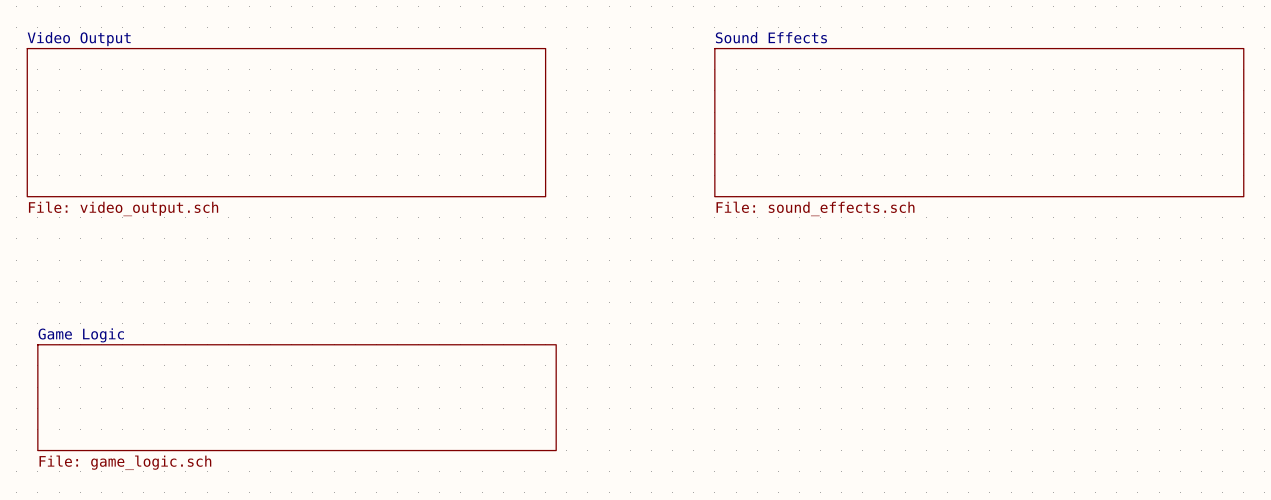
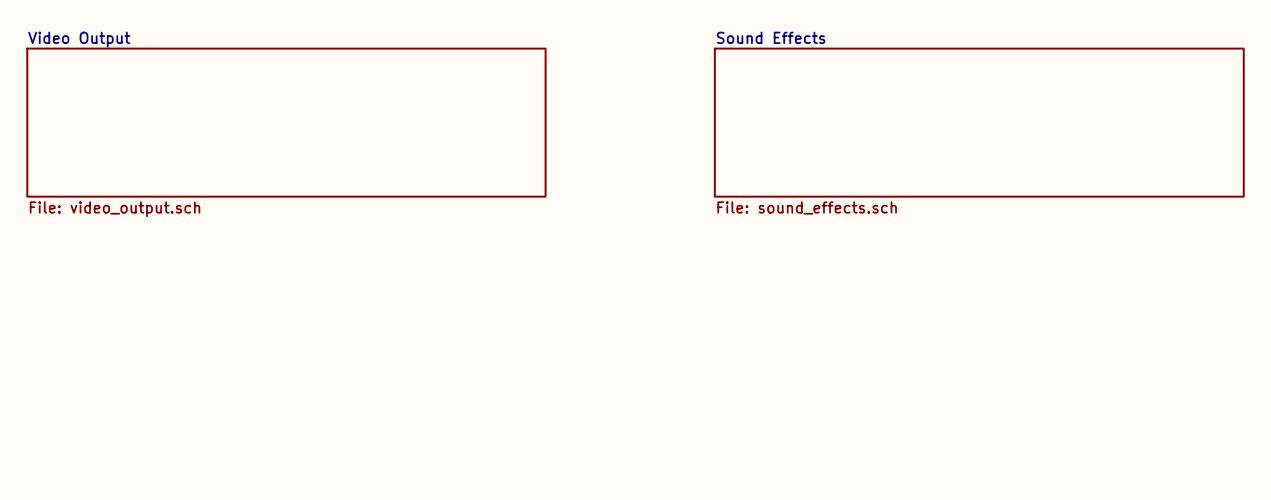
sheet Game Logic: File: game_logic.sch (297, 397) -> none

